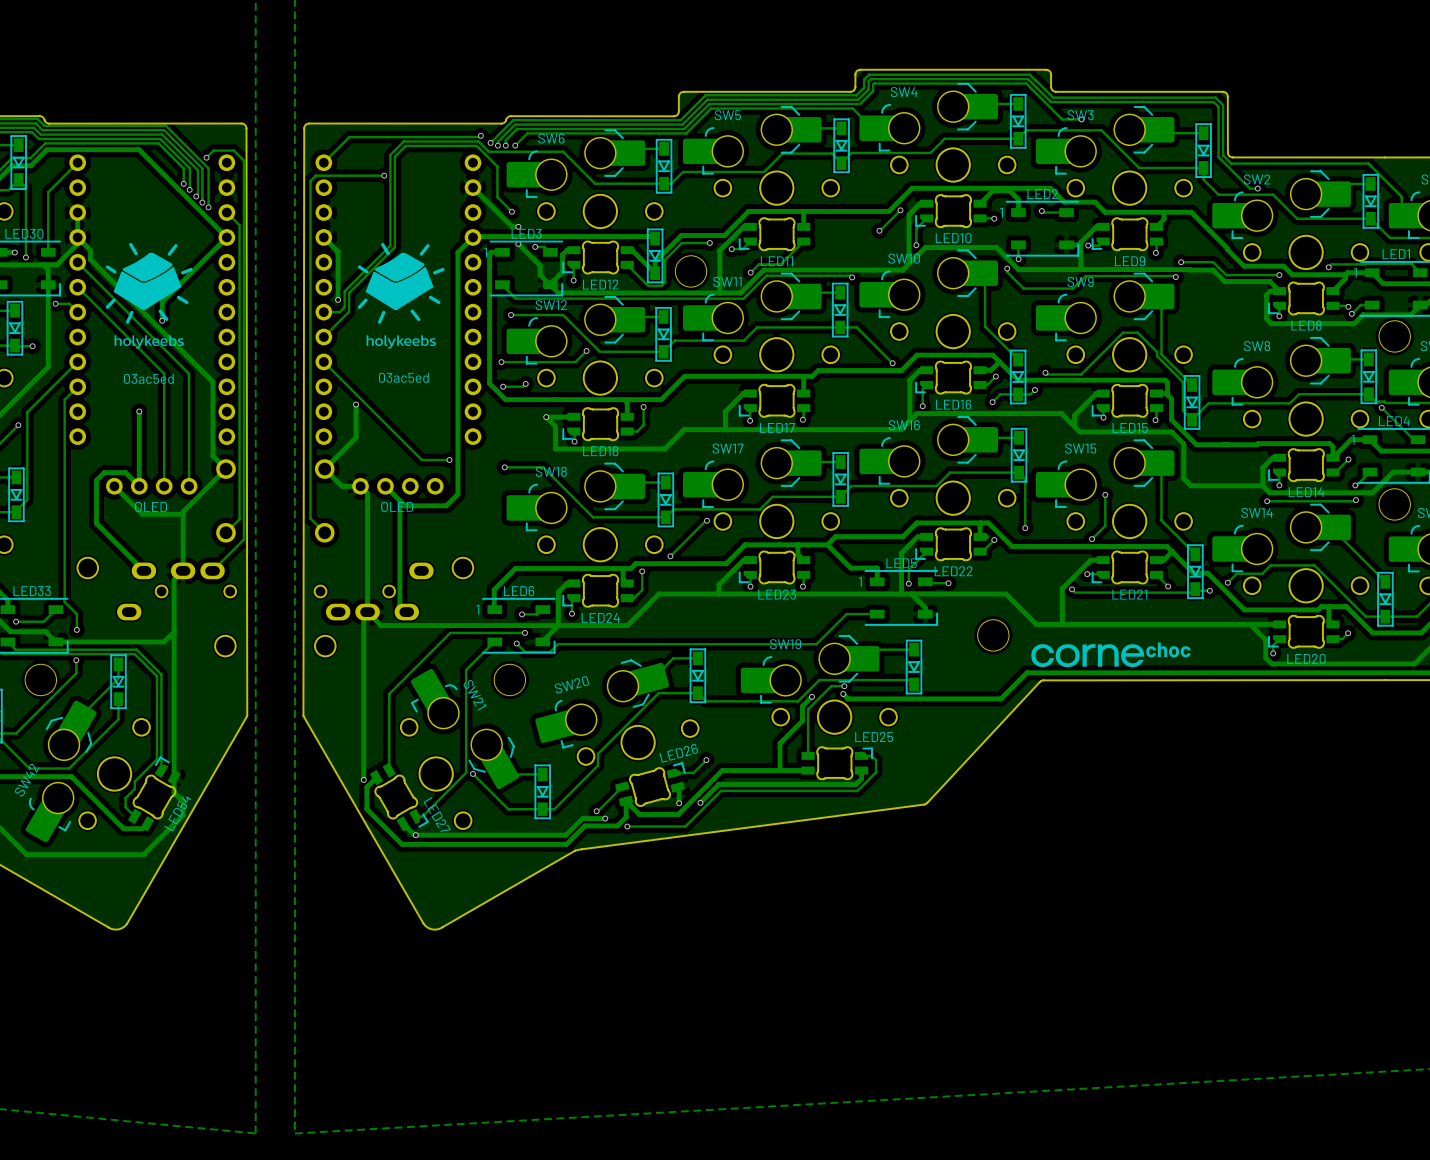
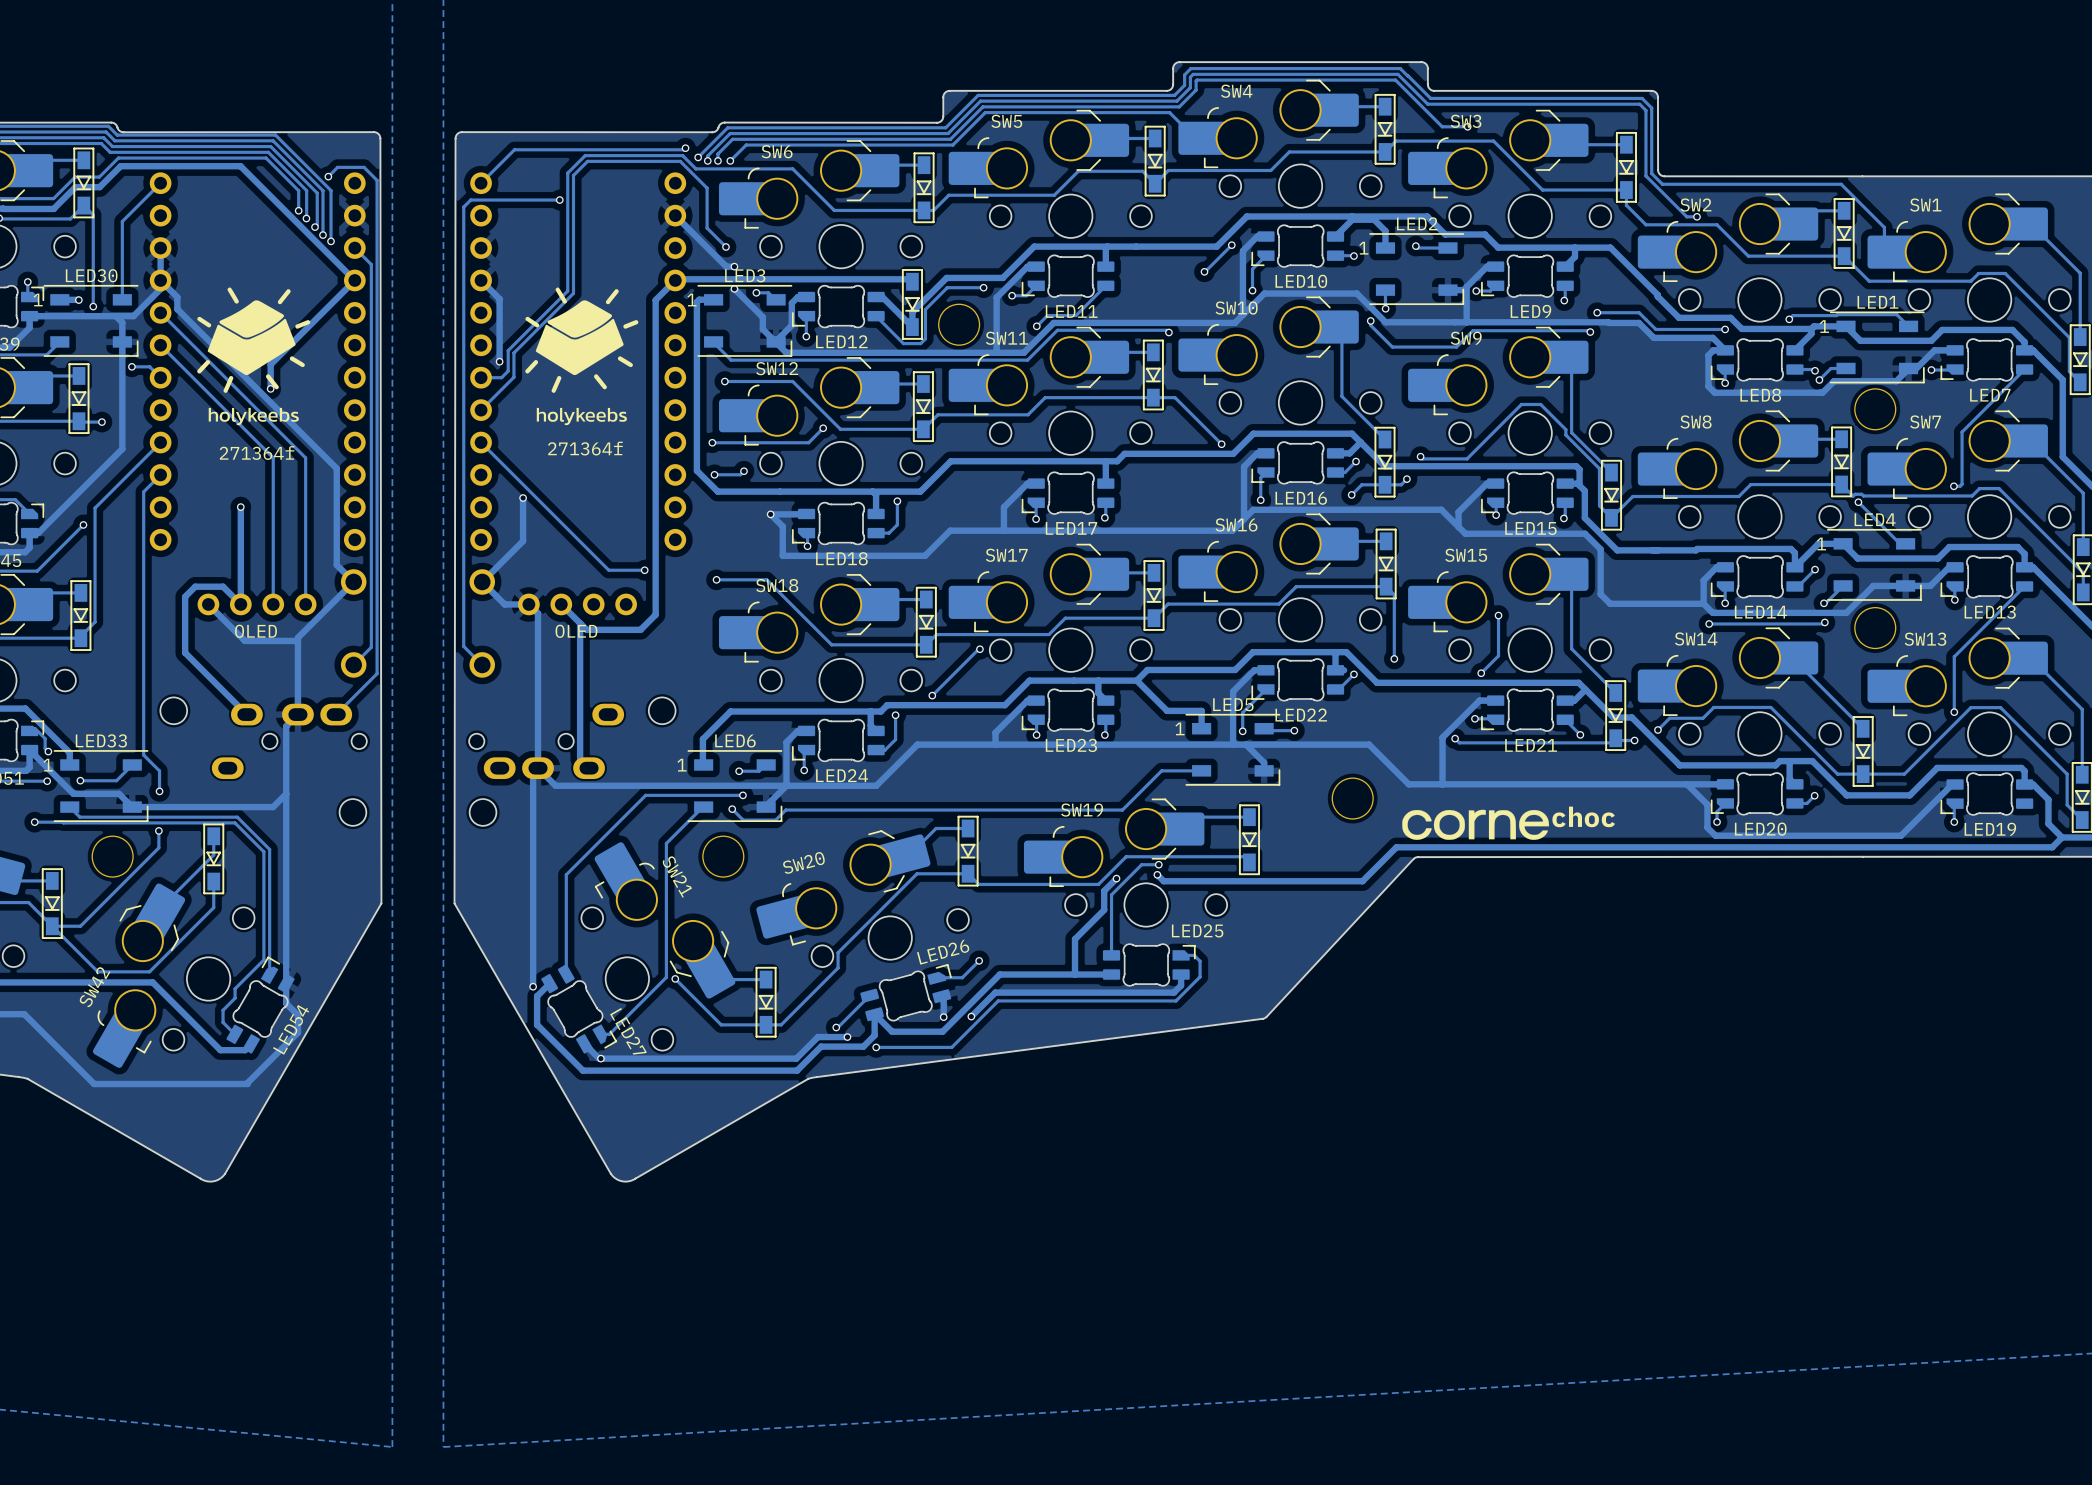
text: none -> 271364f (585, 448)
text: 03ac5ed (403, 377) -> none
text: 03ac5ed (148, 378) -> 271364f (257, 453)

